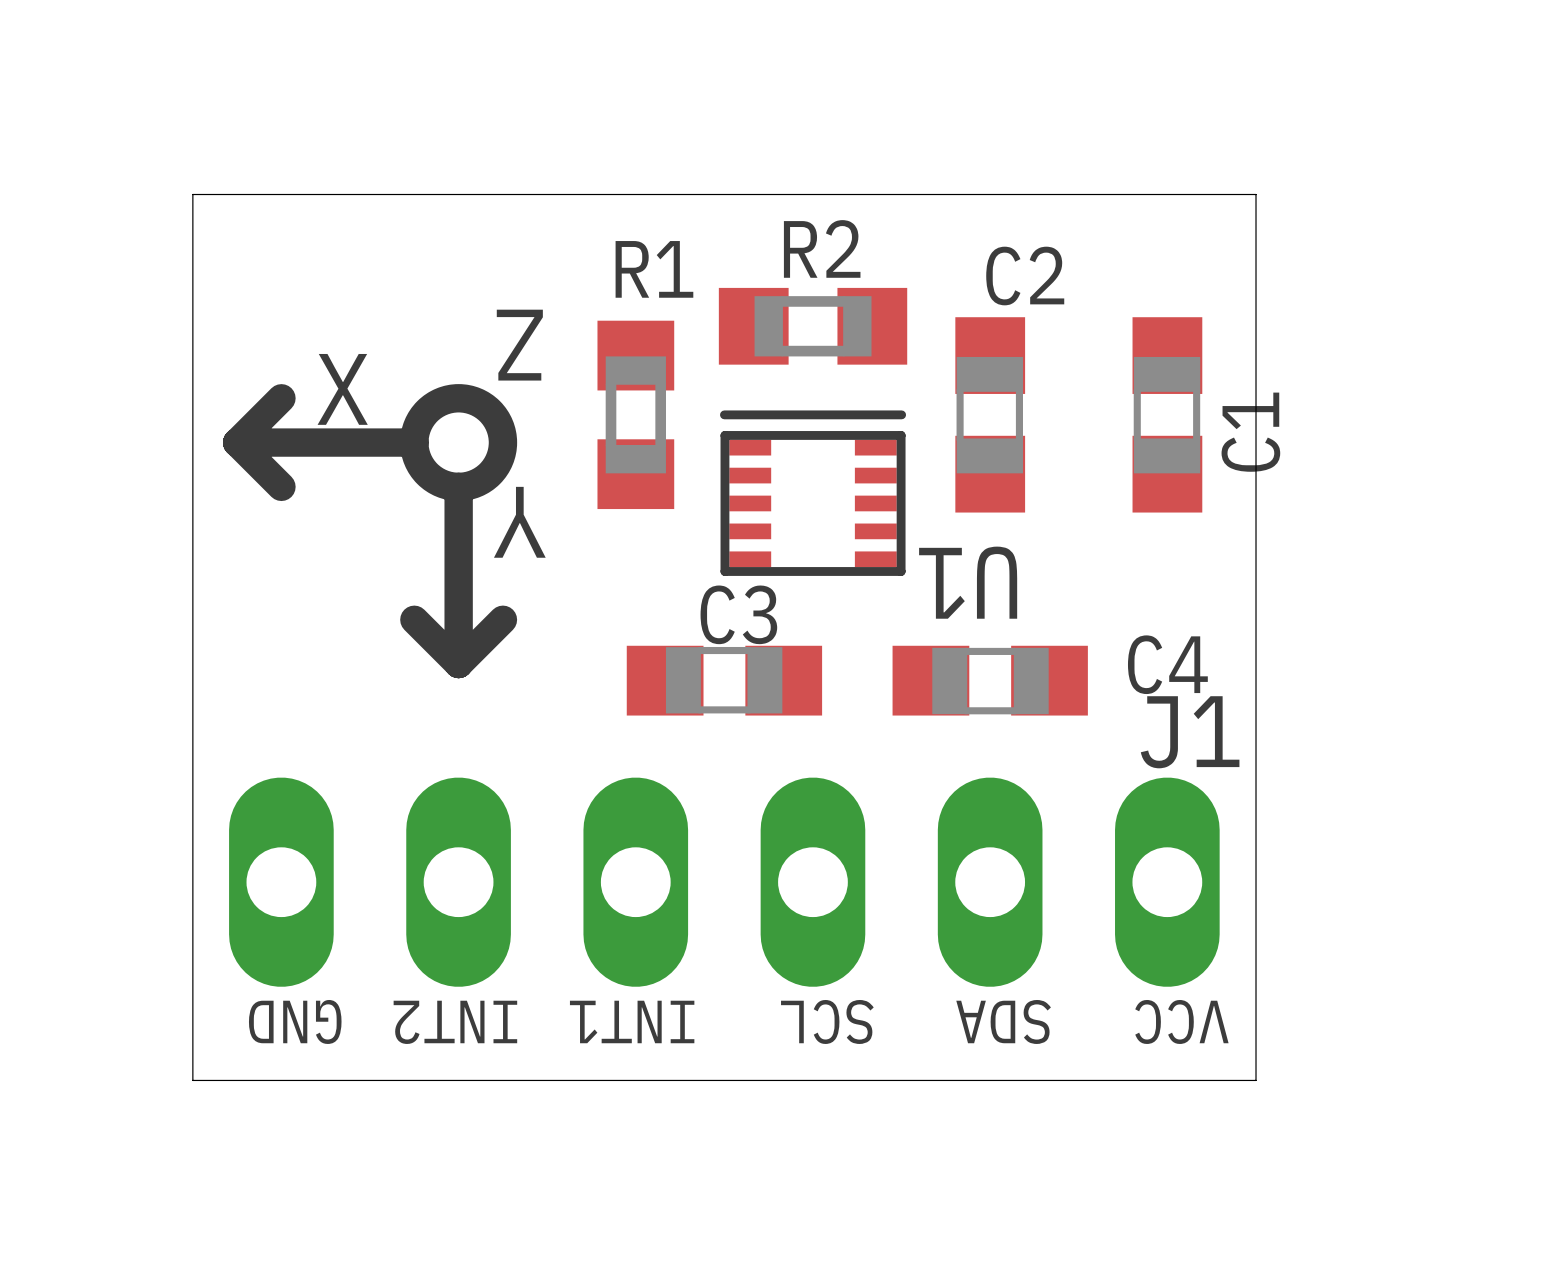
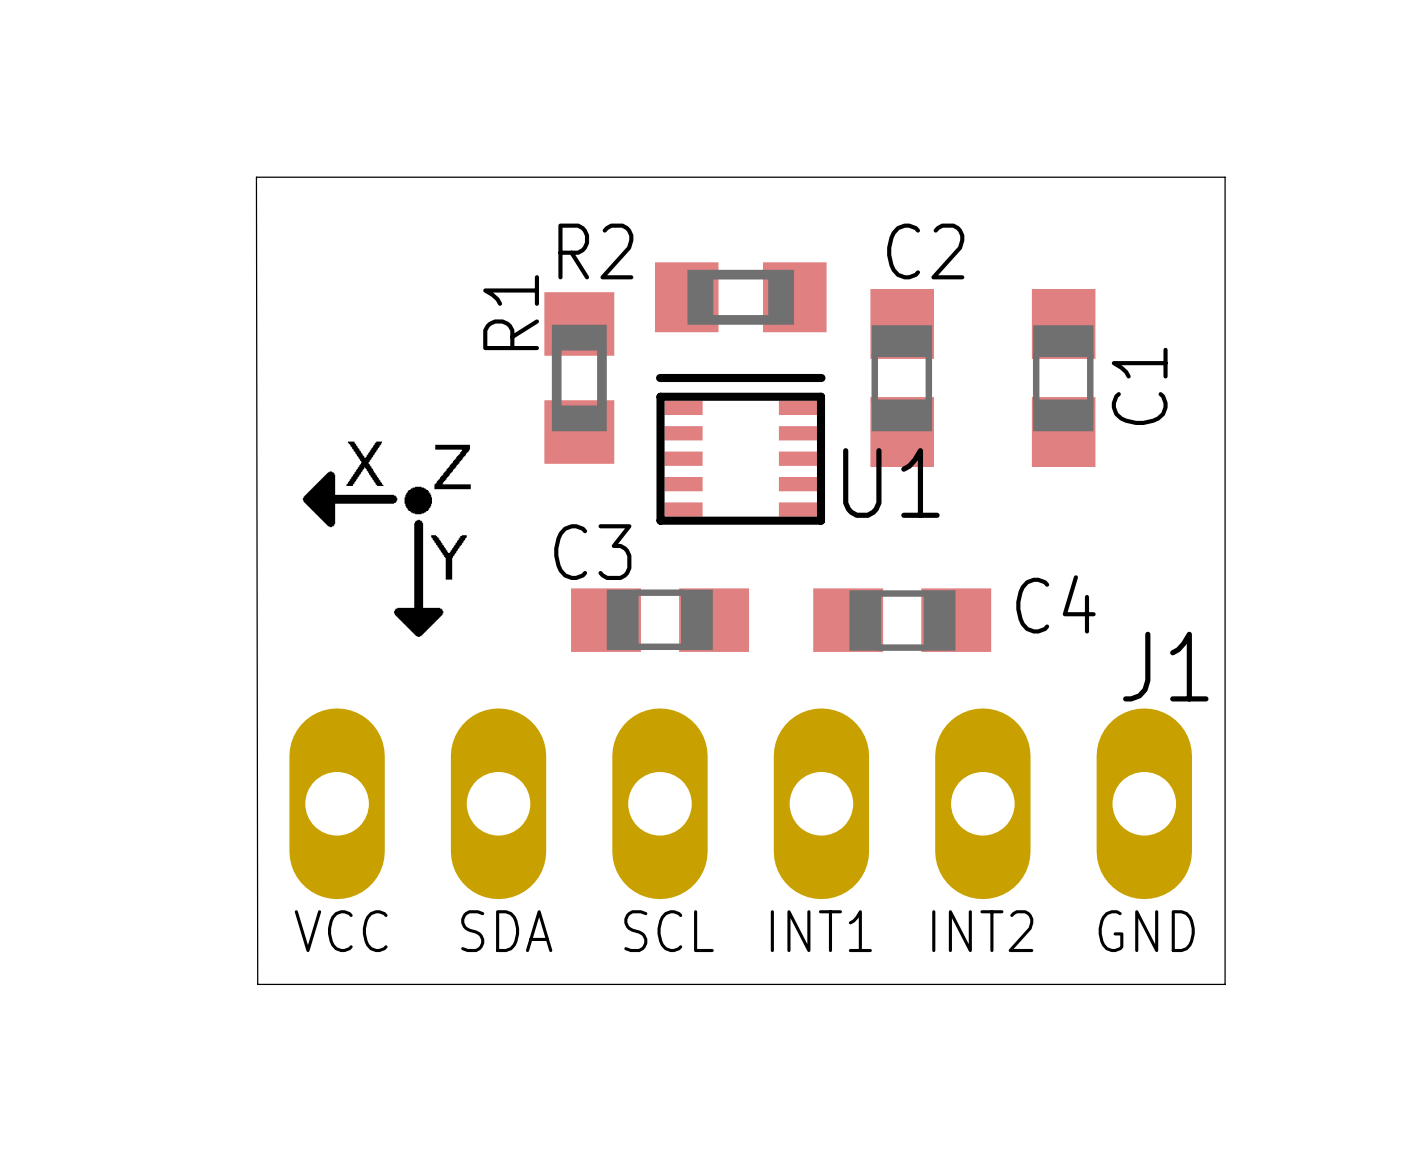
board edge: (281, 194) (192, 194) (192, 1080) (282, 1080) -> (256, 177) (257, 984)
board edge: (1256, 194) (1256, 1080) -> (1144, 177) (1225, 177) (1225, 984) (1144, 984)
R2 name position: R2 (822, 248) -> R2 (595, 251)
R1 name rotation: 0° (654, 269) -> 90° counterclockwise (511, 312)
drawing: [222, 384, 518, 679] -> none
drawing: none -> [302, 441, 471, 637]
text rotation: 0° (968, 582) -> 180° (891, 482)
C3 name position: C3 (738, 614) -> C3 (592, 552)
text position: J1 (1190, 732) -> J1 (1165, 666)
part position: (724, 882) -> (740, 803)
text rotation: 0° (295, 1021) -> 180° (1146, 931)
text position: GND (295, 1021) -> GND (1146, 931)
text rotation: 0° (632, 1021) -> 180° (821, 931)
text position: INT1 (632, 1021) -> INT1 (821, 931)
text rotation: 0° (827, 1021) -> 180° (669, 931)
text rotation: 0° (1003, 1021) -> 180° (506, 931)
text position: SDA (1003, 1021) -> SDA (506, 931)
text rotation: 0° (1181, 1021) -> 180° (341, 931)
text position: VCC (1181, 1021) -> VCC (341, 931)
text rotation: 0° (455, 1022) -> 180° (982, 931)
text position: INT2 (455, 1022) -> INT2 (982, 931)

